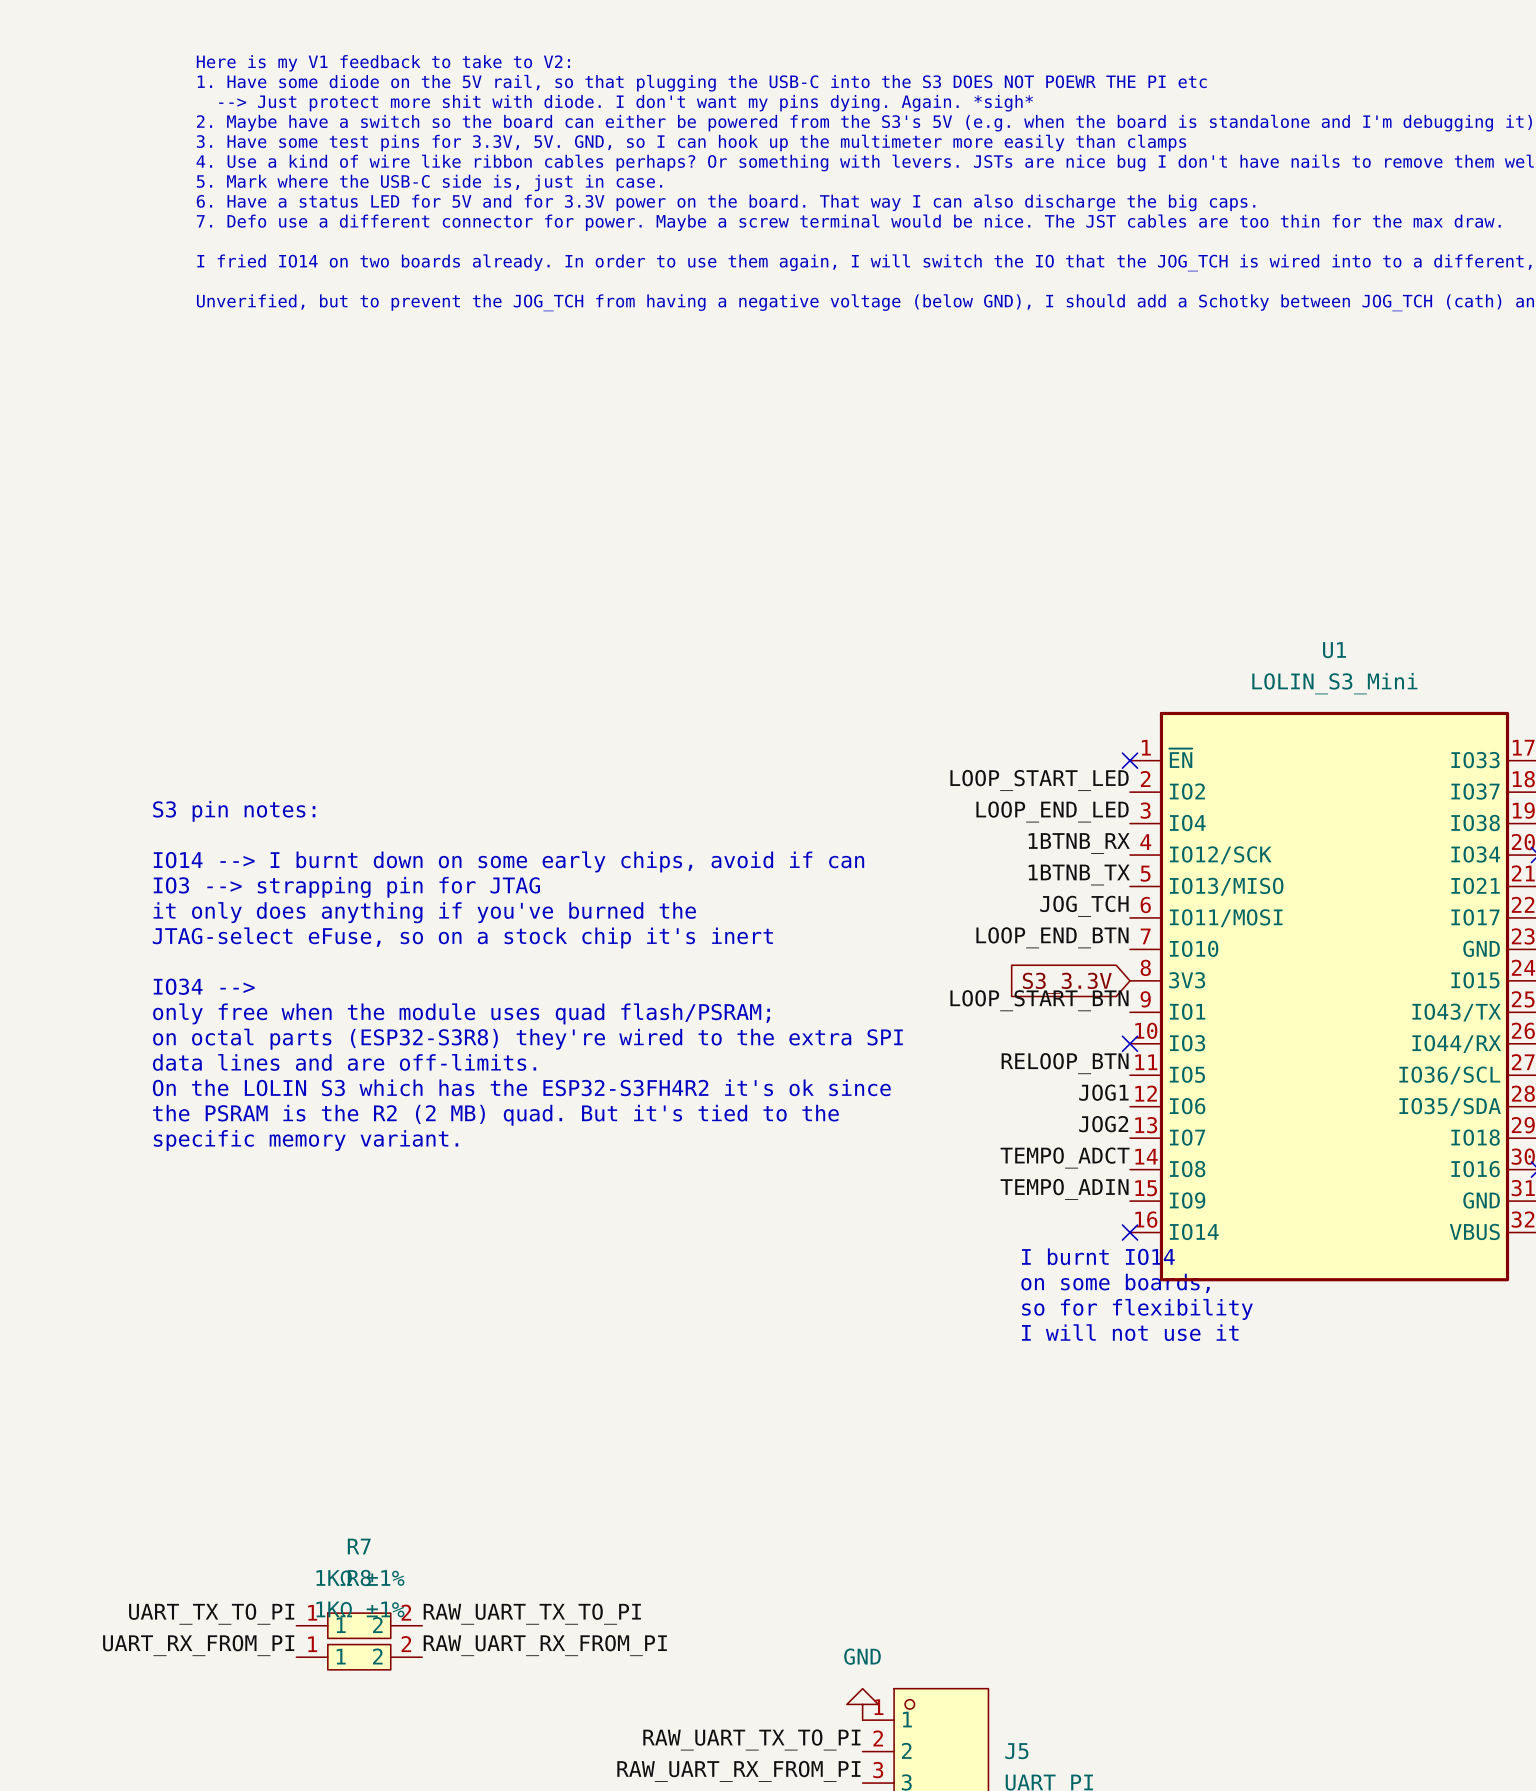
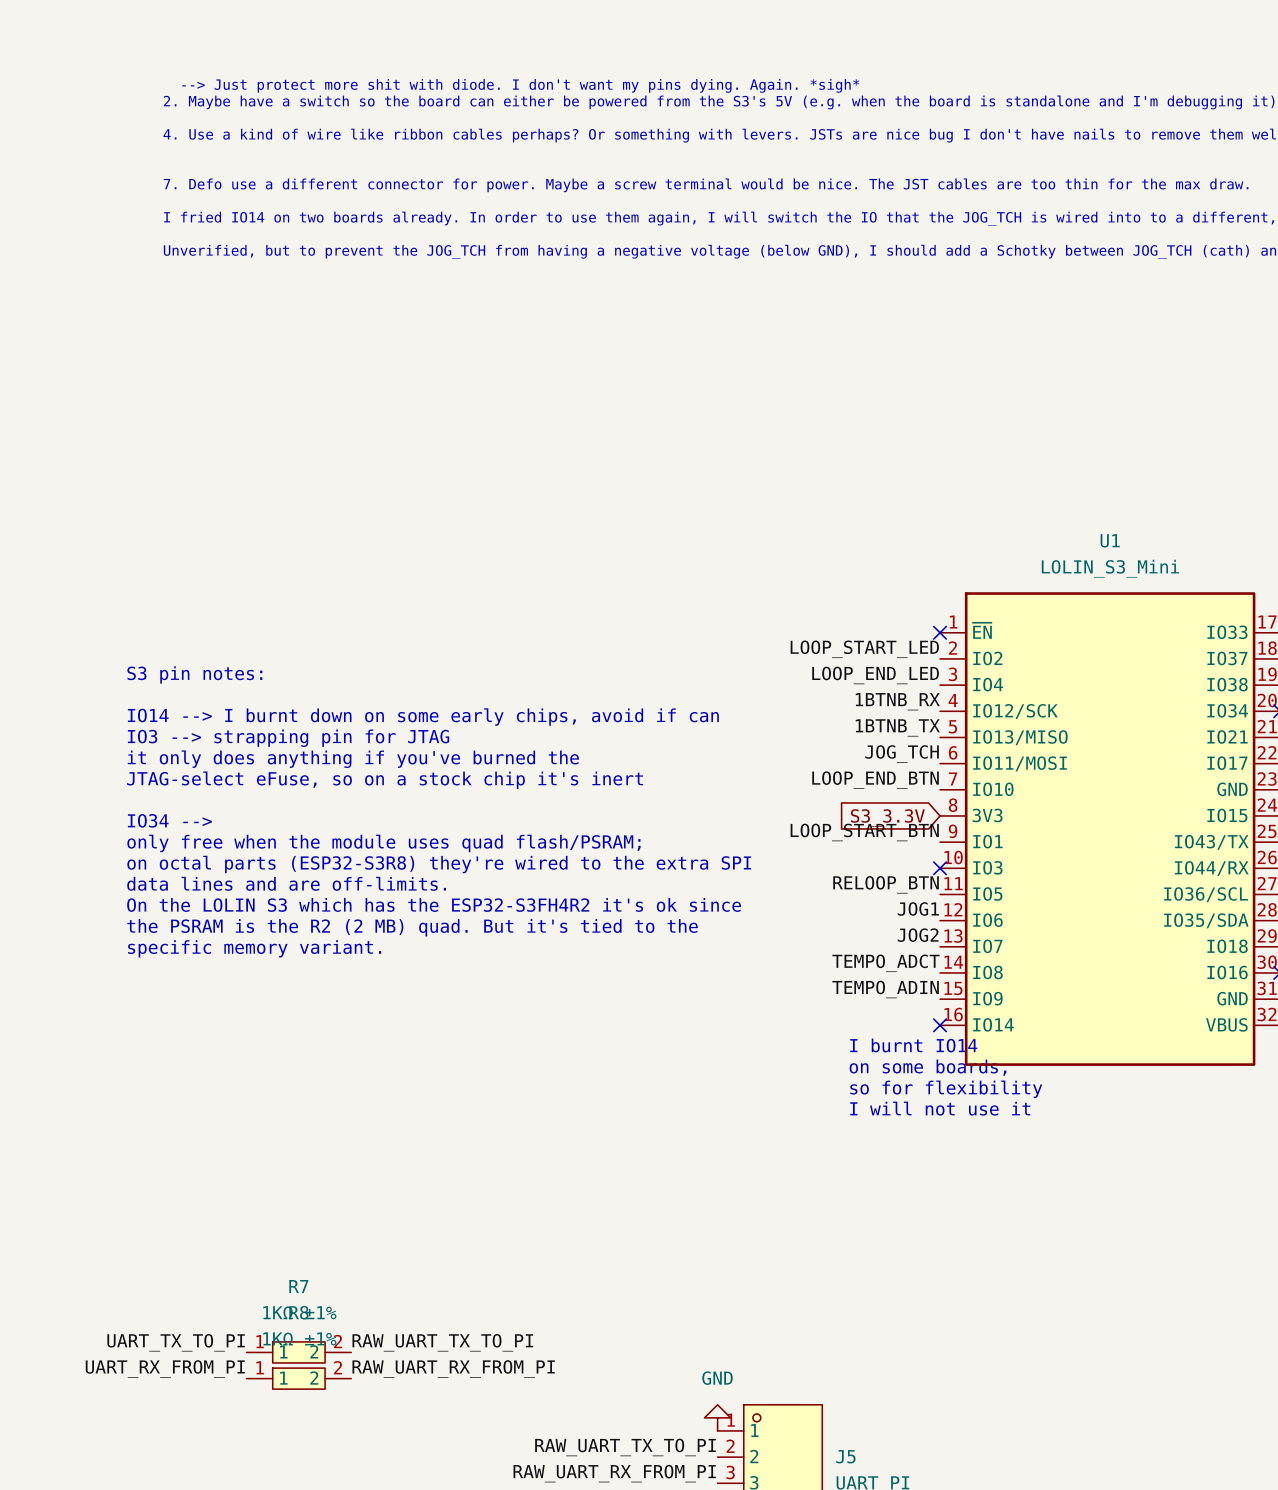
text: Here is my V1 feedback to take to V2: (383, 63) -> none
text: 1. Have some diode on the 5V rail, so that plugging the USB-C into the S3 DOES NOT POEWR THE PI etc (702, 83) -> none
text: 3. Have some test pins for 3.3V, 5V. GND, so I can hook up the multimeter more easily than clamps (691, 143) -> none
text: 5. Mark where the USB-C side is, just in case. (429, 182) -> none
text: 6. Have a status LED for 5V and for 3.3V power on the board. That way I can also discharge the big caps. (726, 202) -> none

